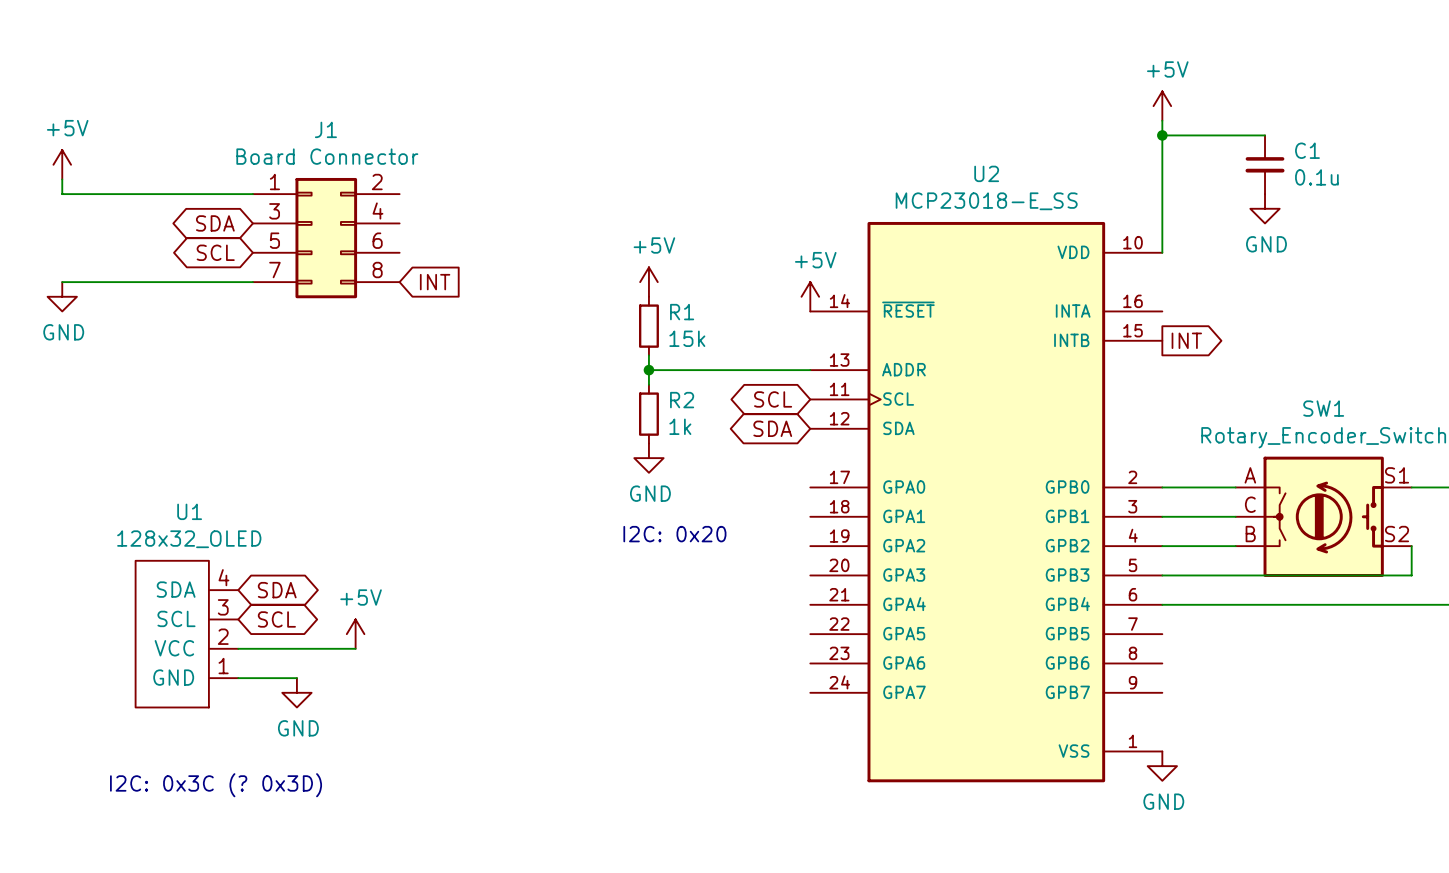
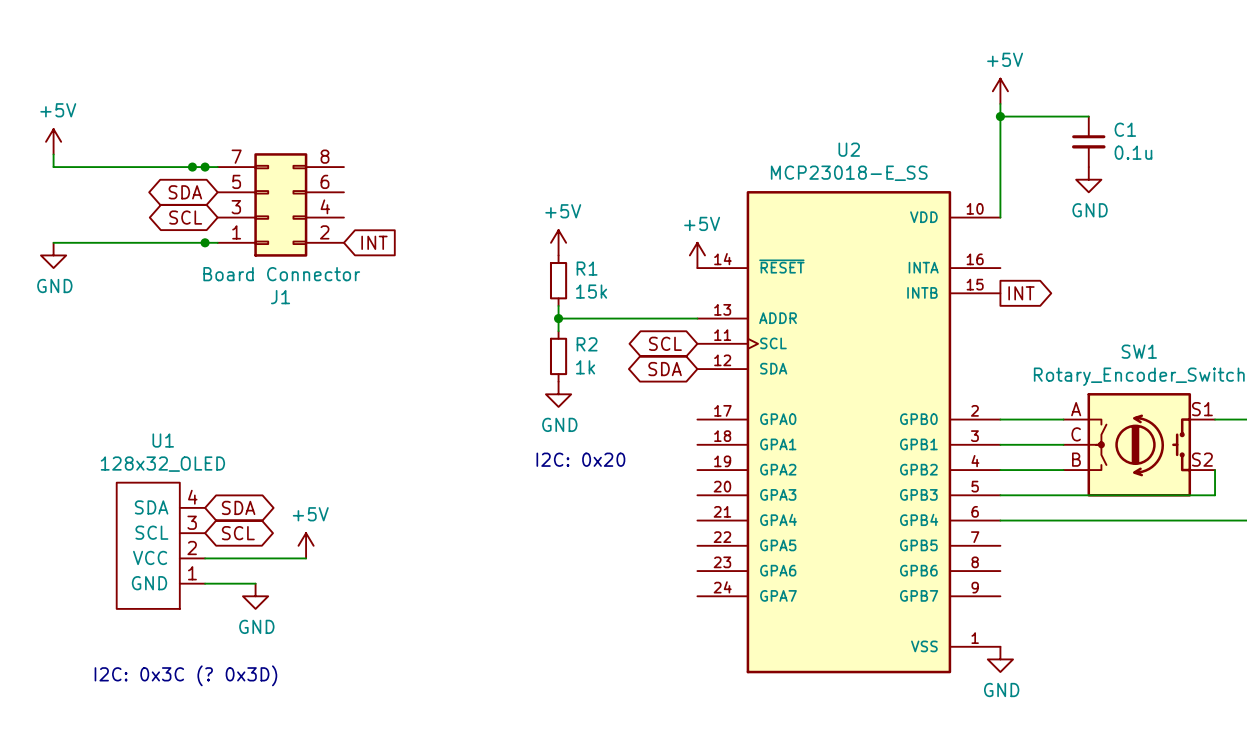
junction: none -> (192, 167)
junction: none -> (205, 167)
J1 flip: as is (326, 238) -> up-down (280, 204)
junction: none -> (205, 242)

